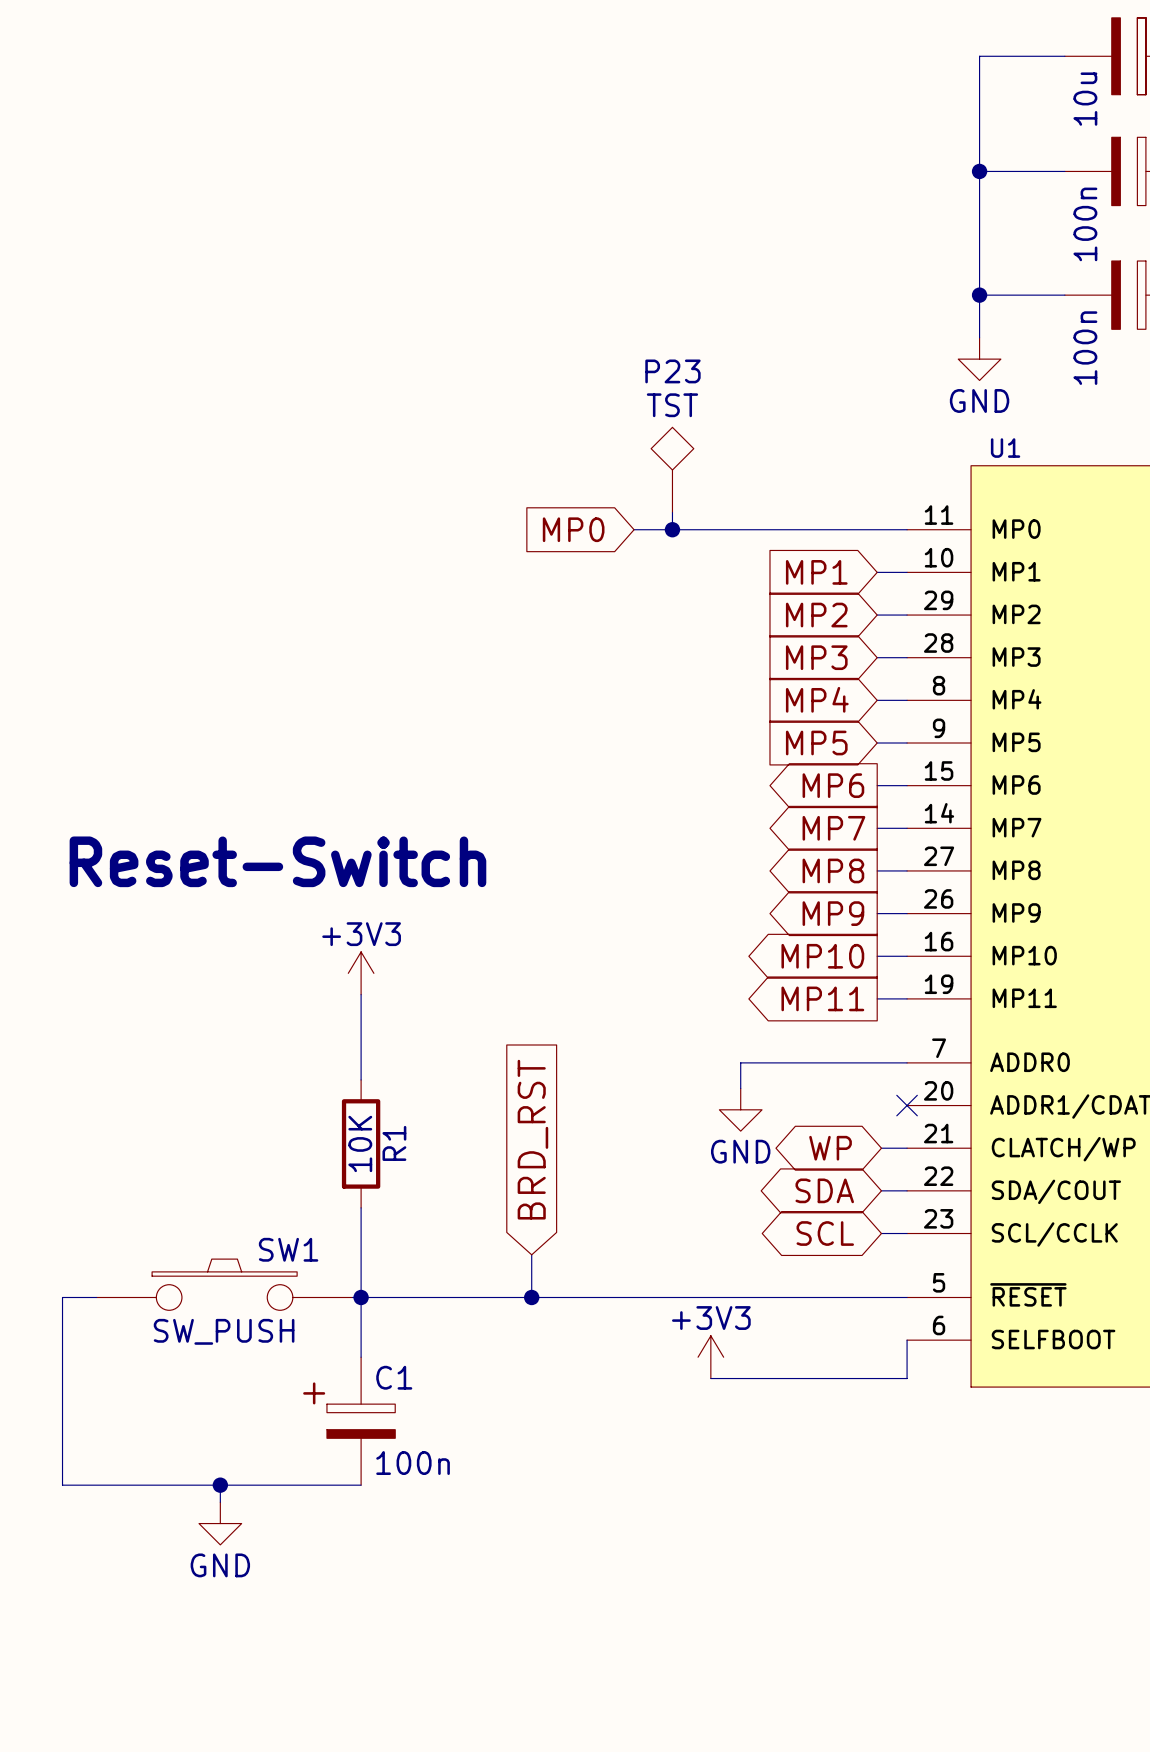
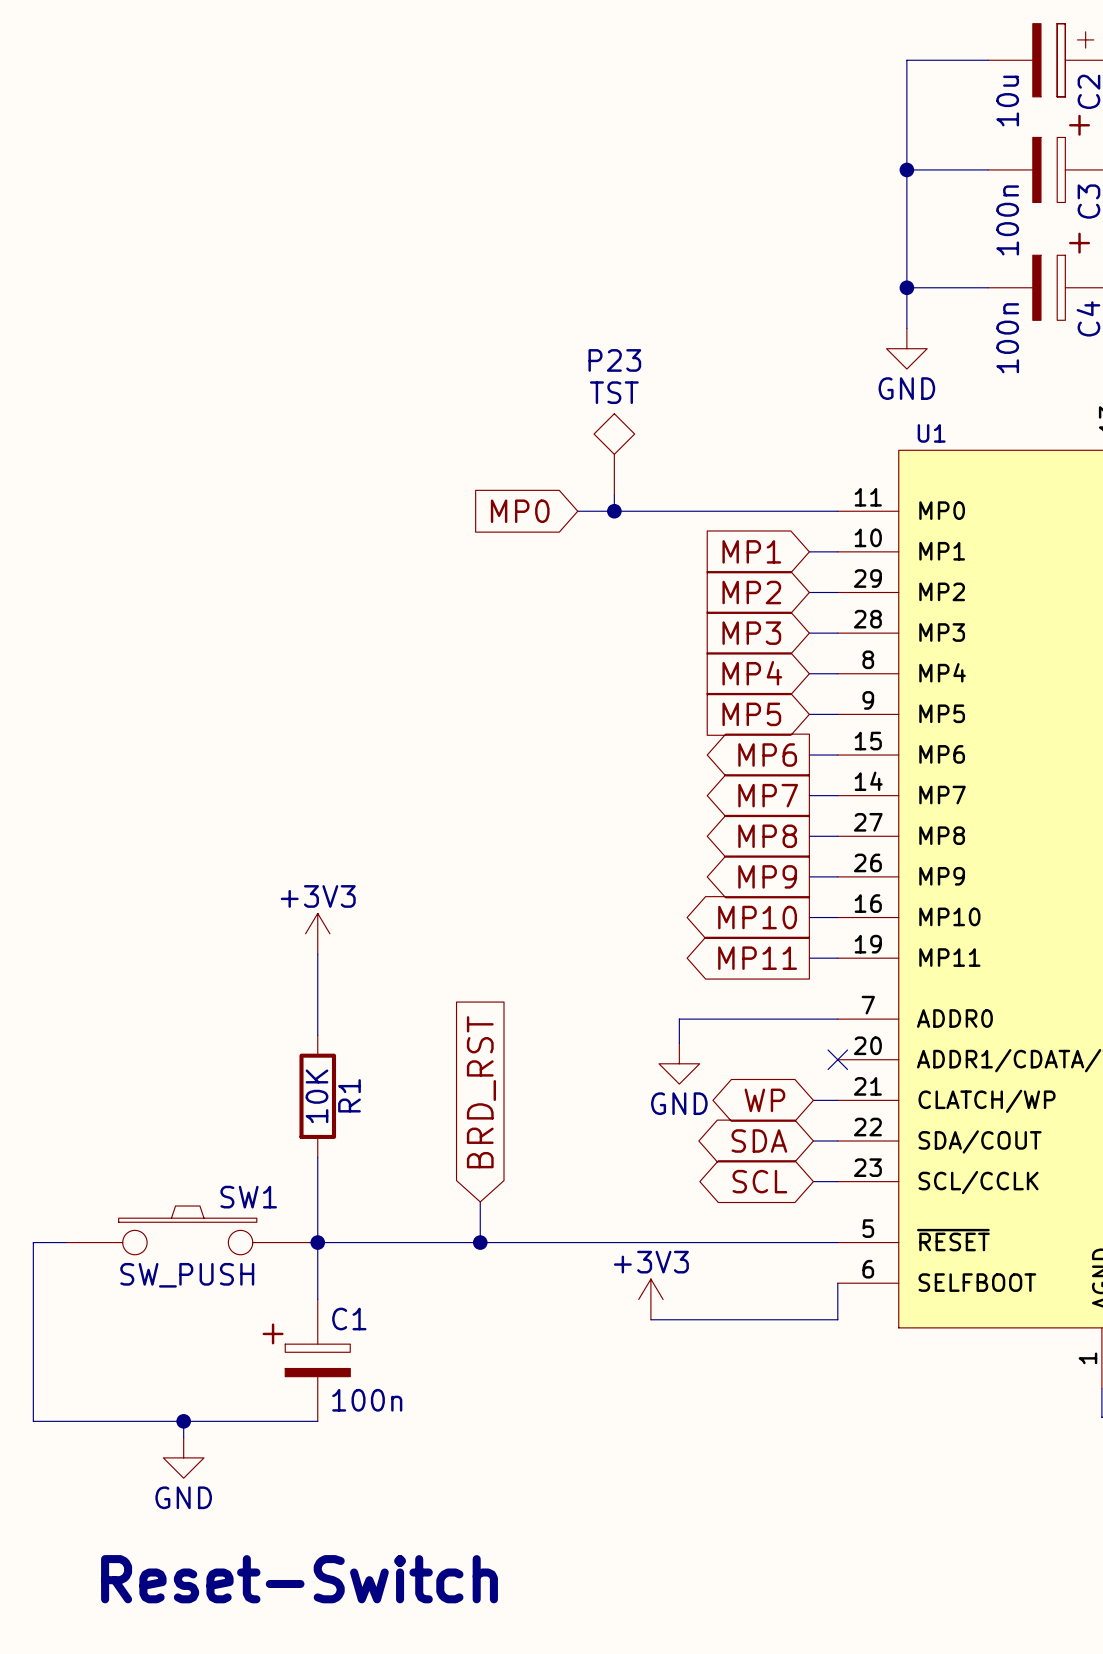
text: Reset-Switch (277, 861) -> none
text: none -> Reset-Switch (299, 1579)

